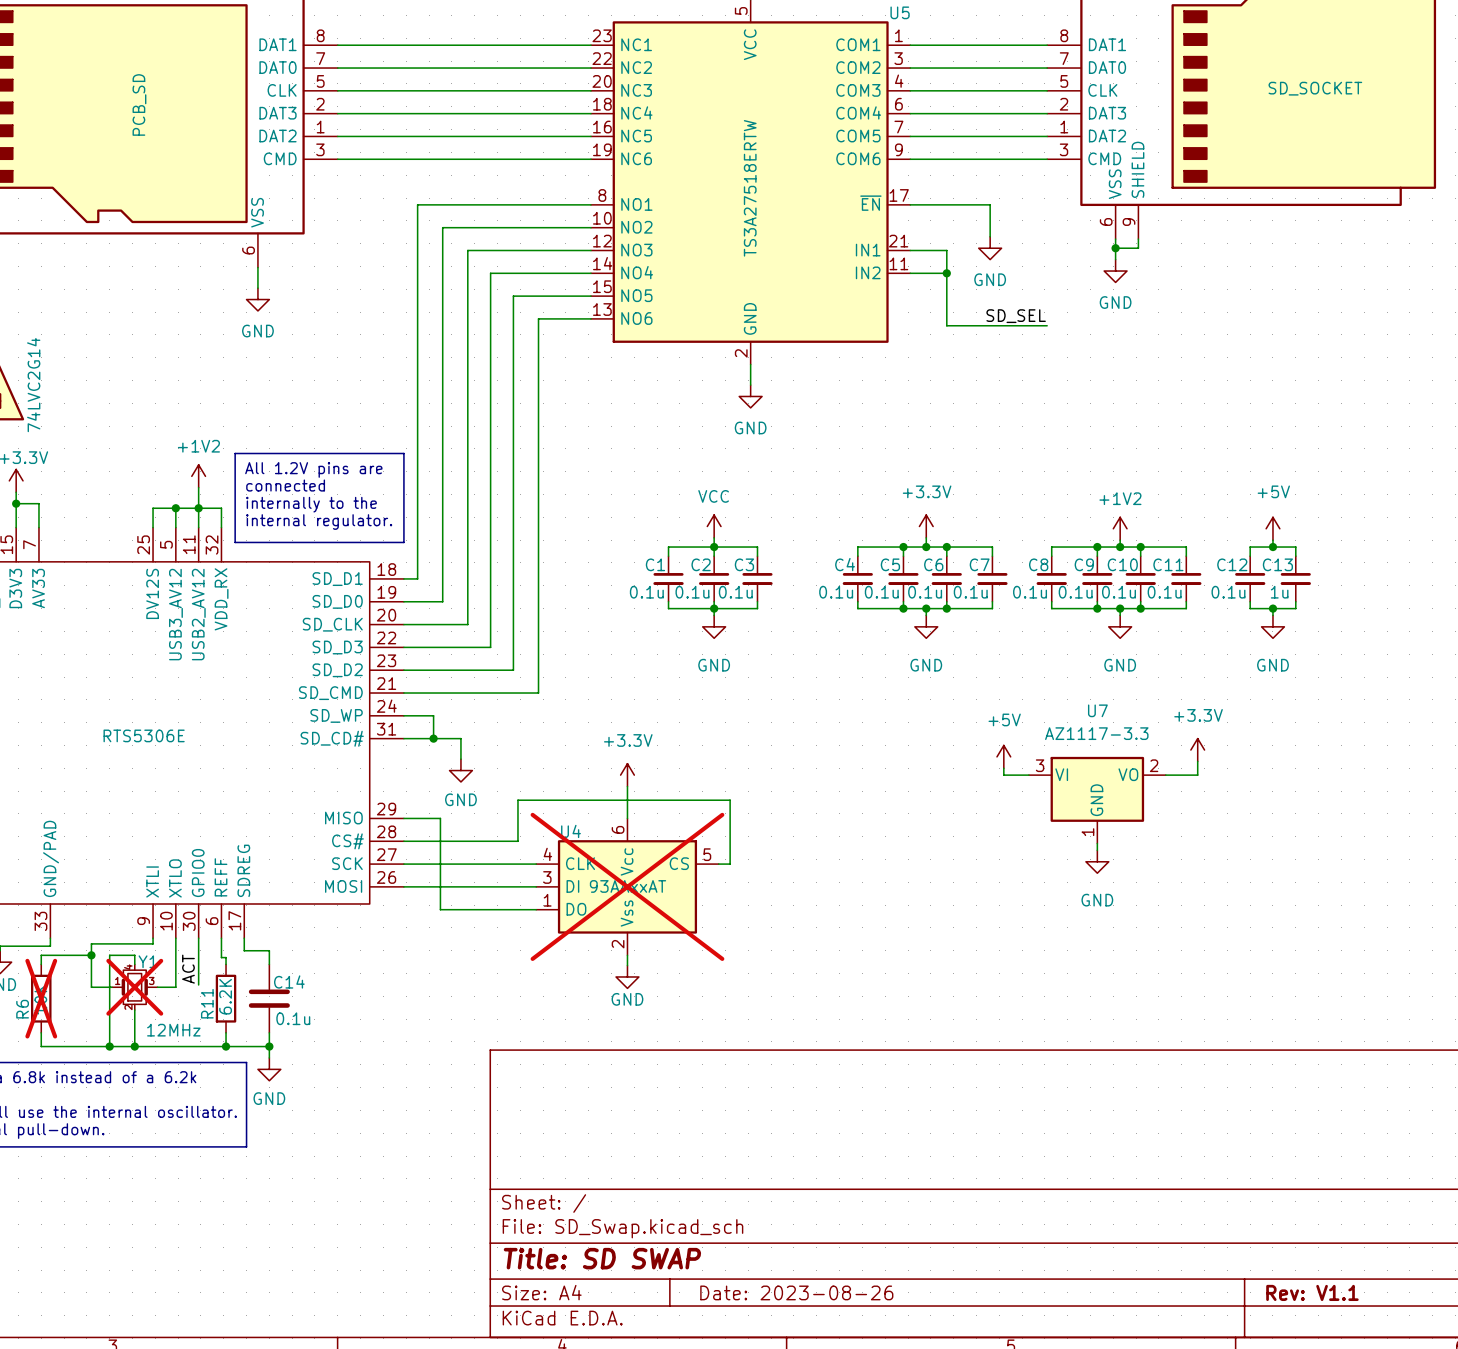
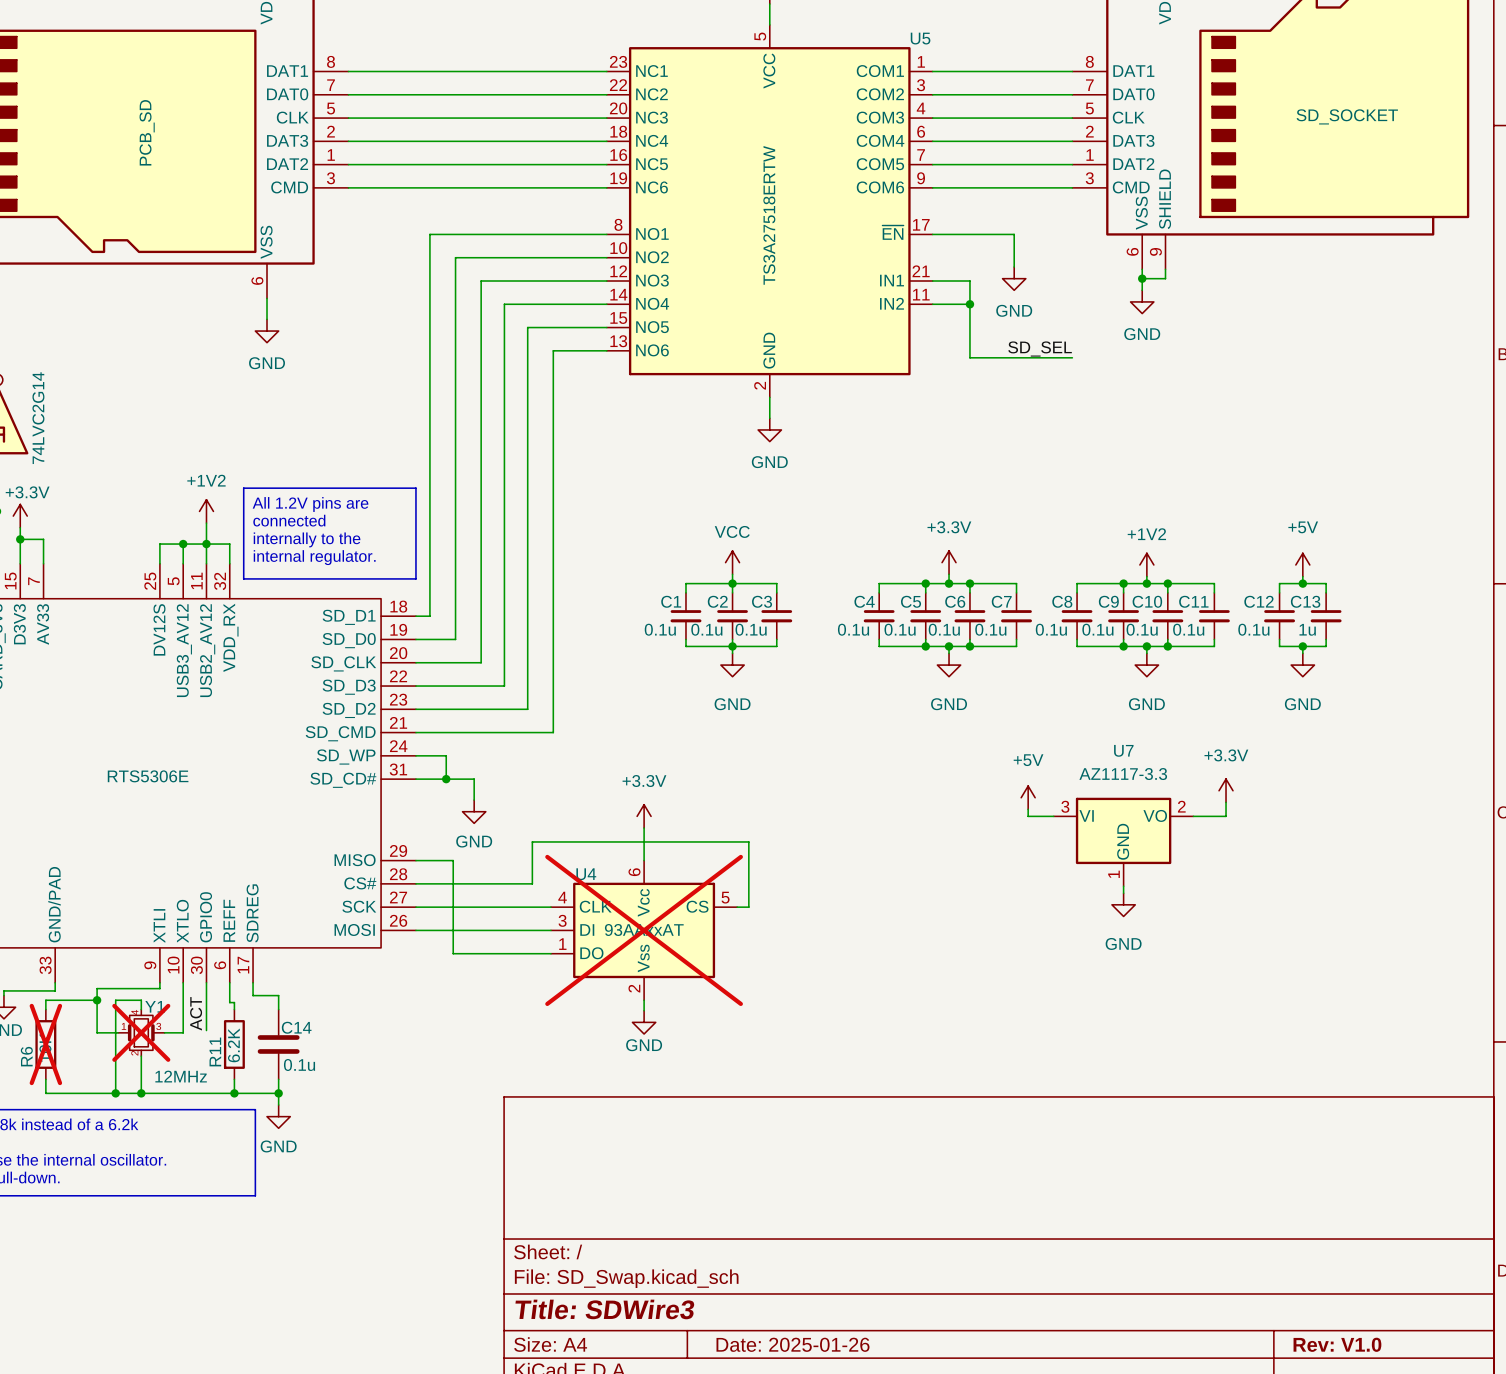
title block: Title: SD SWAP (602, 1258) -> Title: SDWire3 (604, 1309)
title block: Date: 2023-08-26 (796, 1292) -> Date: 2025-01-26 (792, 1344)
title block: Rev: V1.1 (1312, 1292) -> Rev: V1.0 (1337, 1344)

